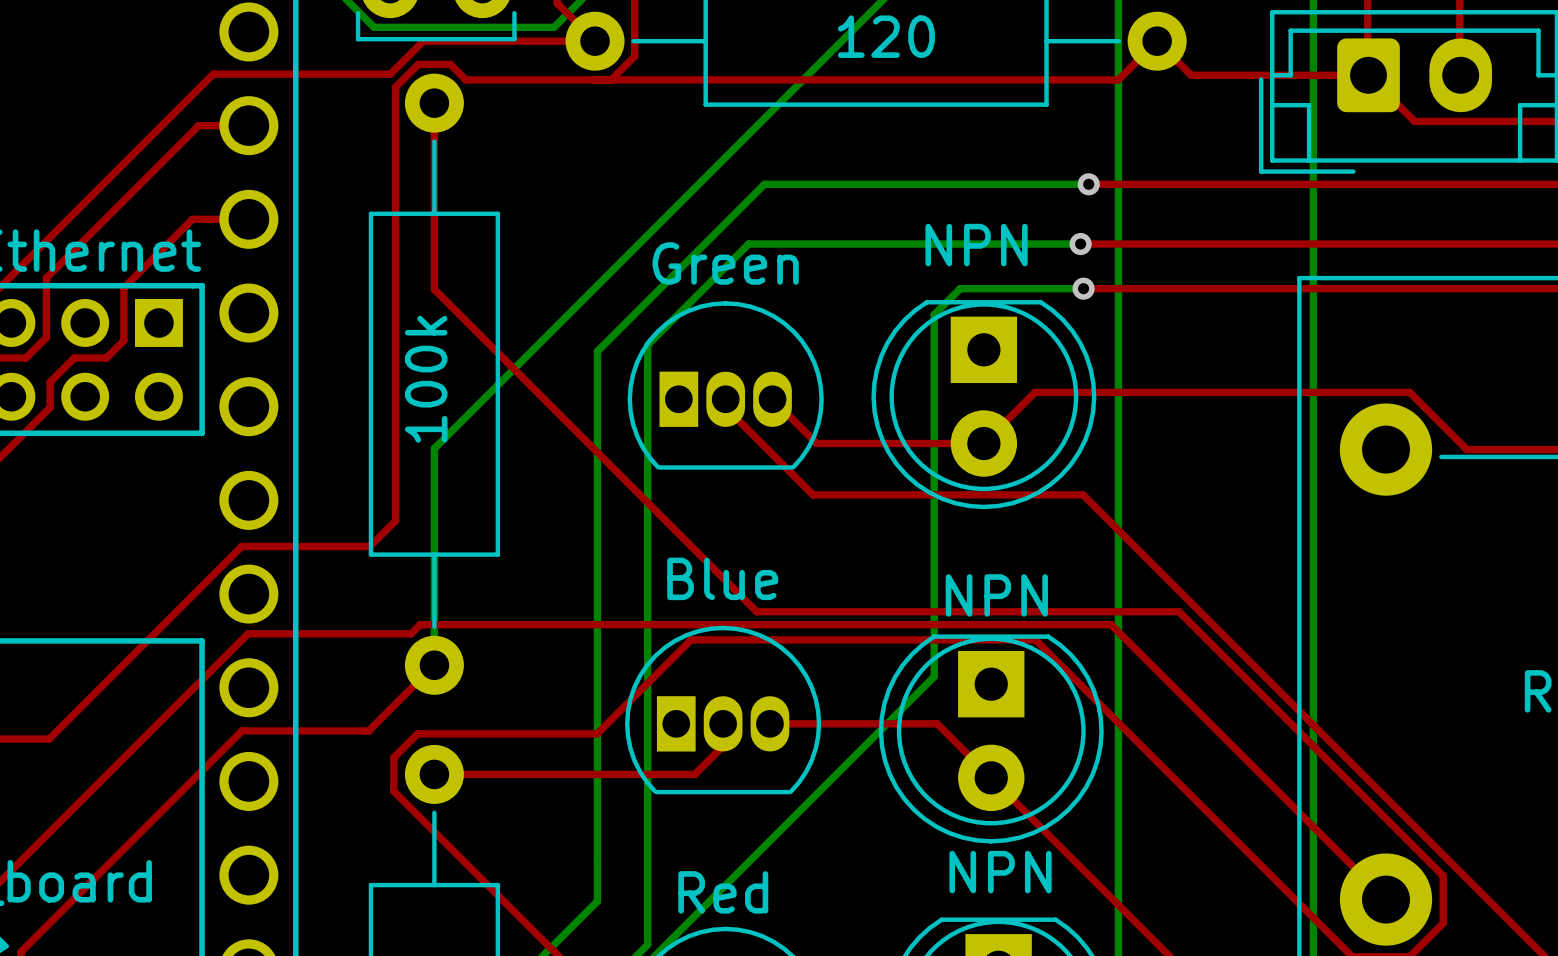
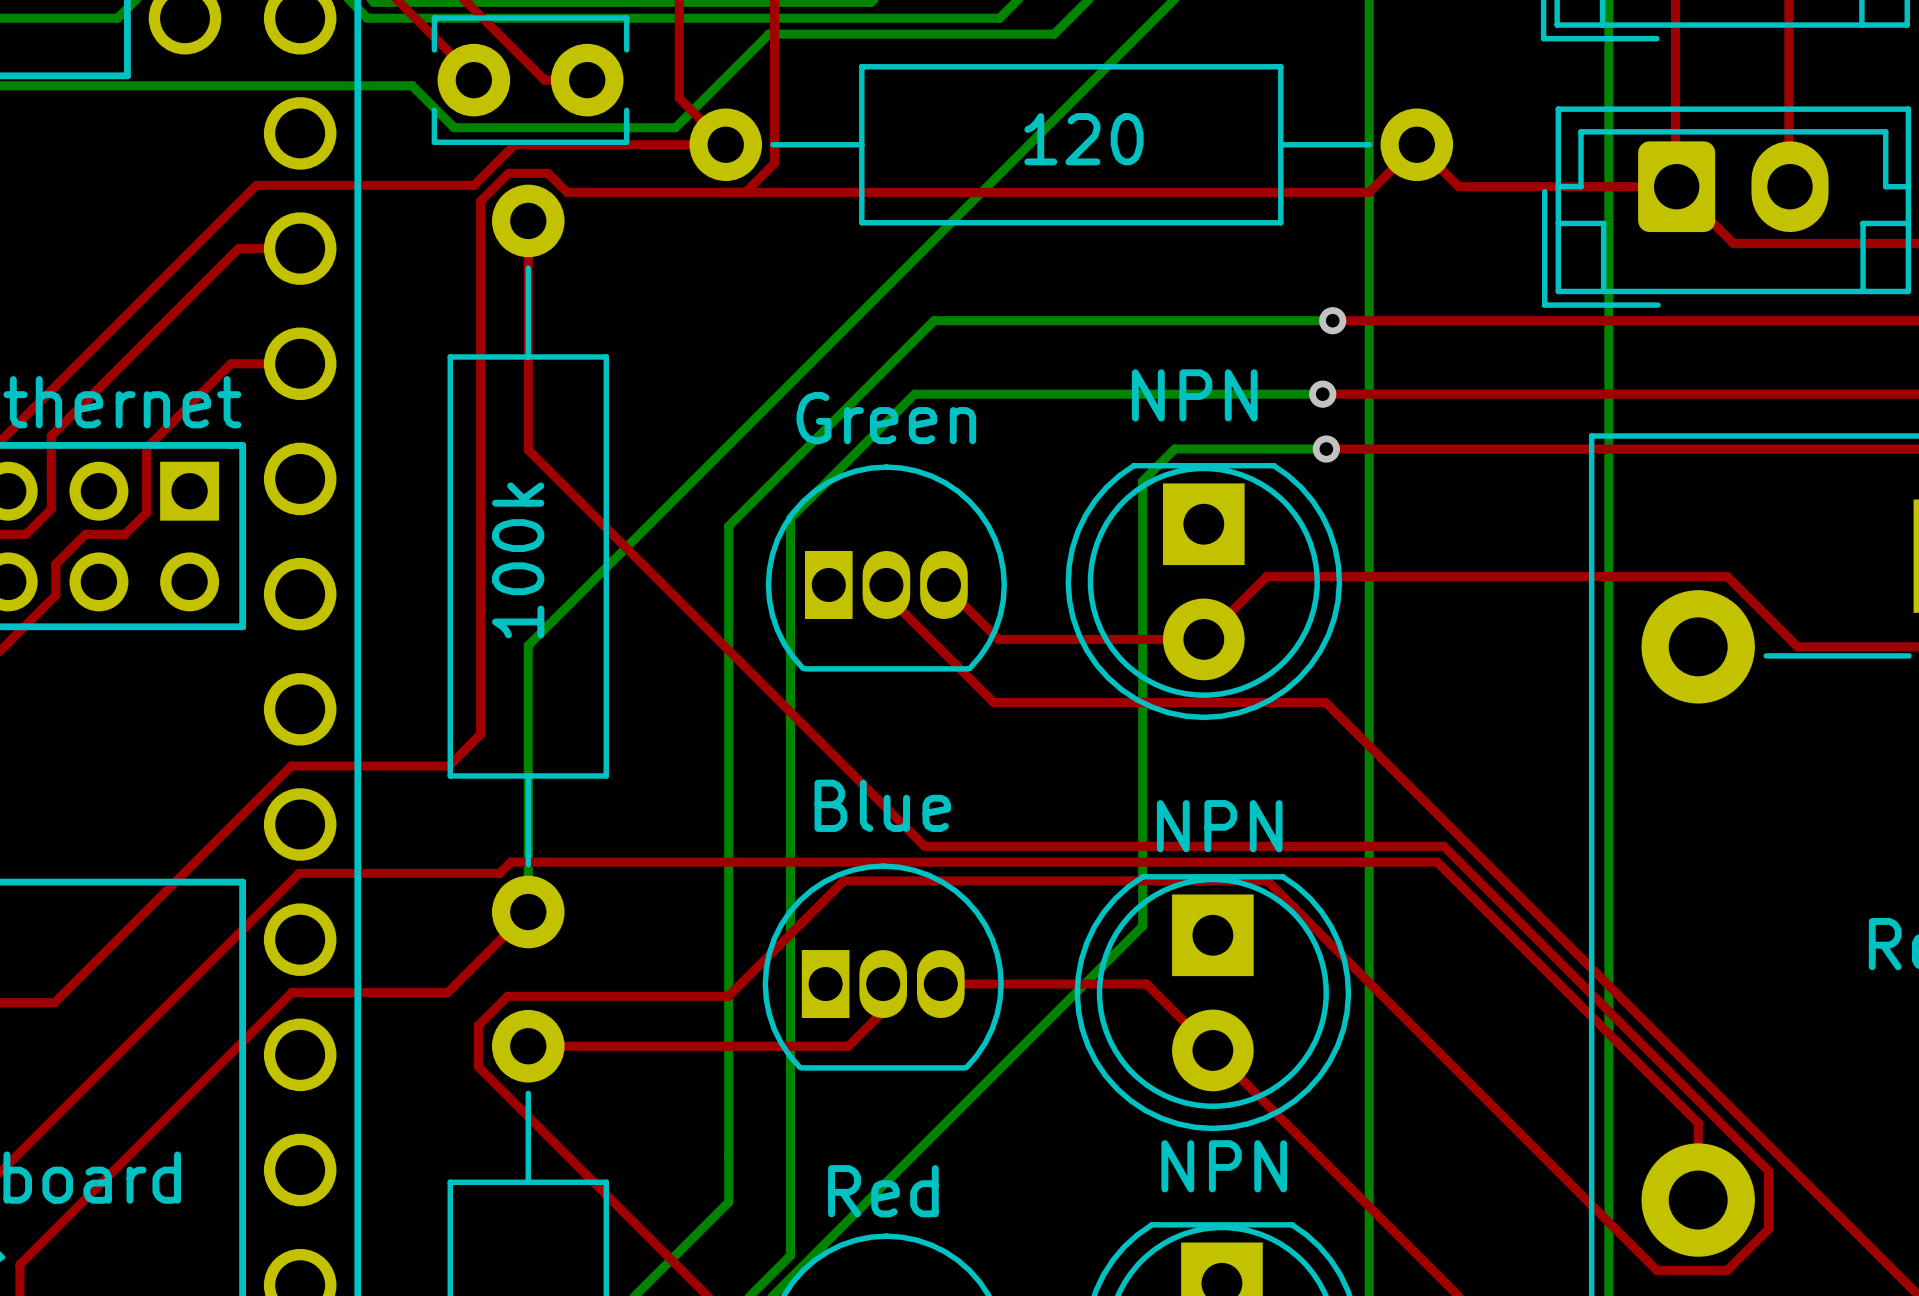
top track: (1111, 624) (1386, 899) -> (1360, 862) (1437, 862) (1698, 1123) (1698, 1200)

